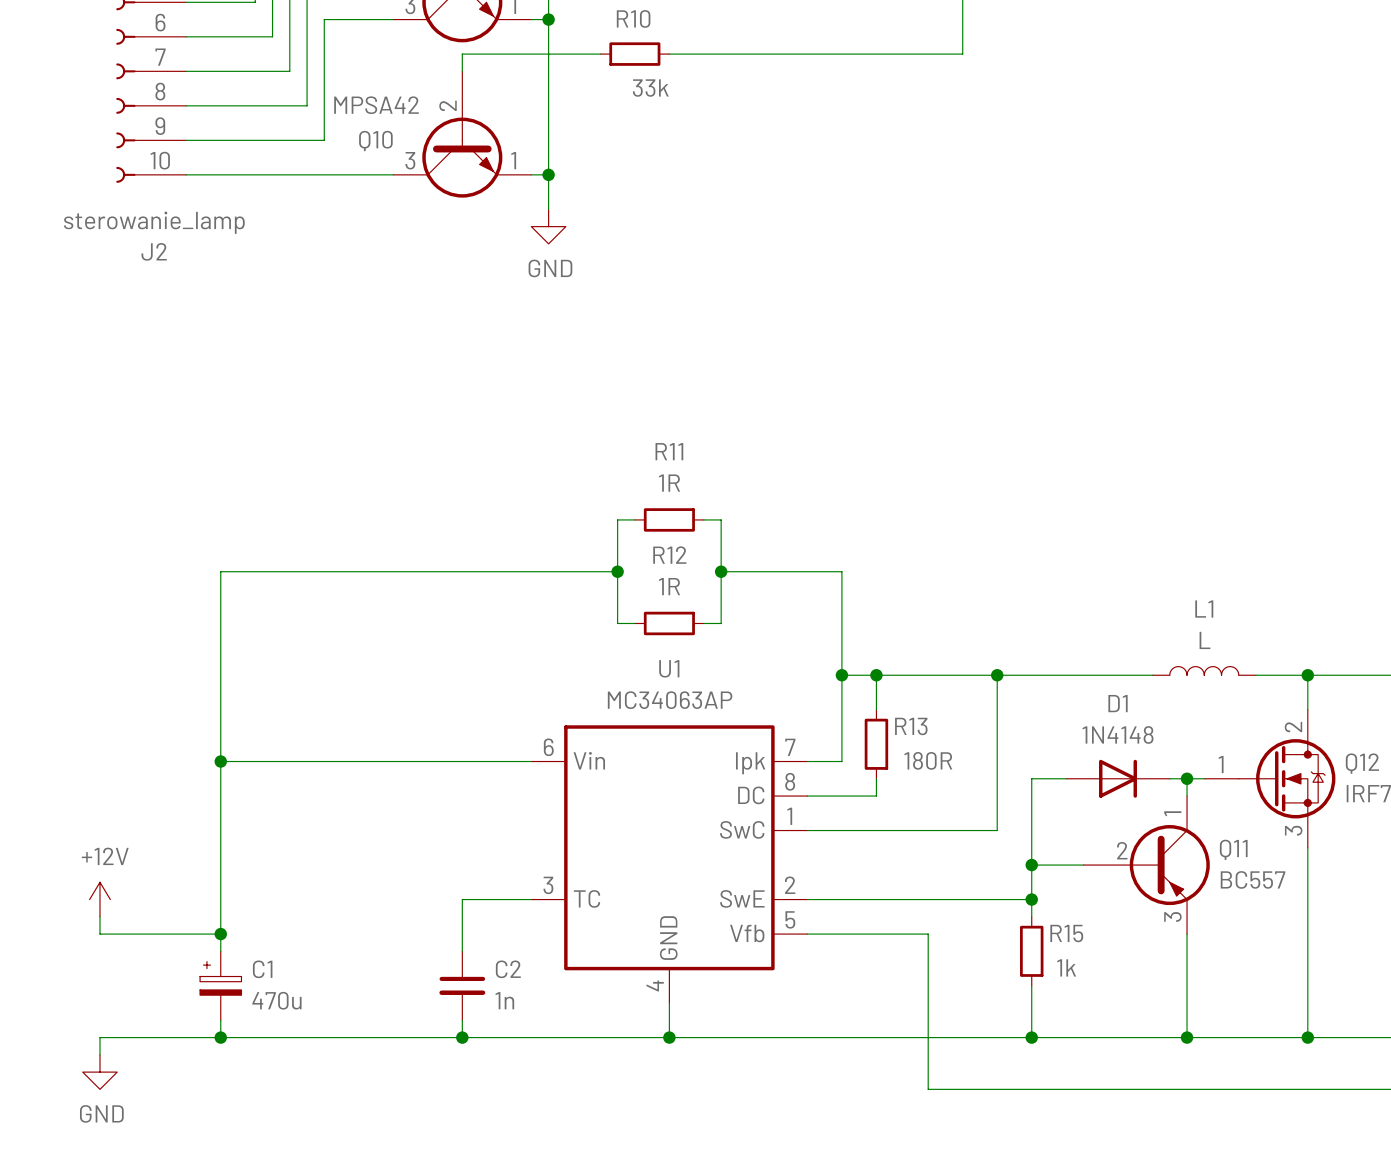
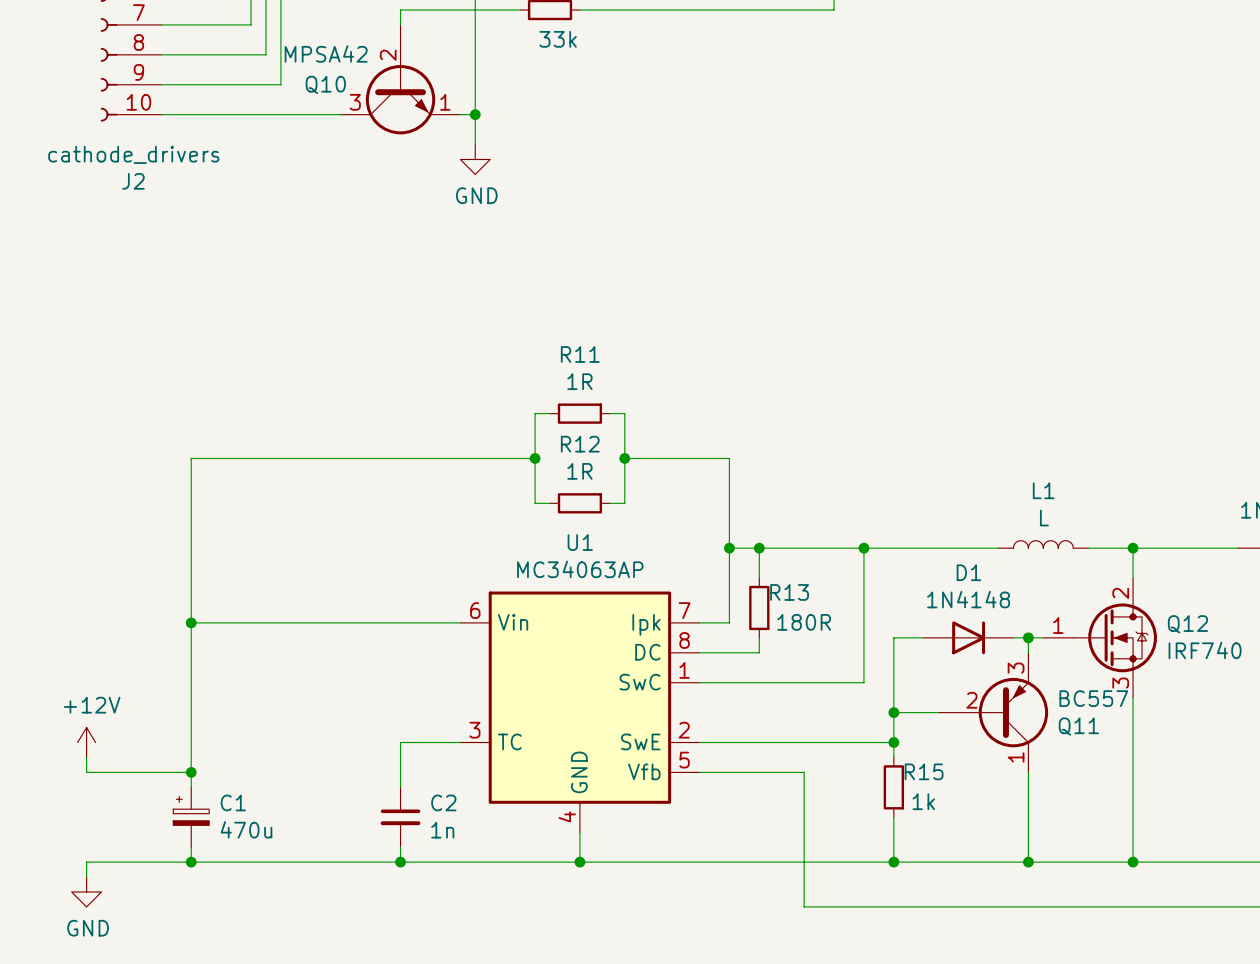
J2 value: sterowanie_lamp (154, 222) -> cathode_drivers (133, 154)
Q11 flip: as is (1169, 865) -> up-down (1013, 712)

